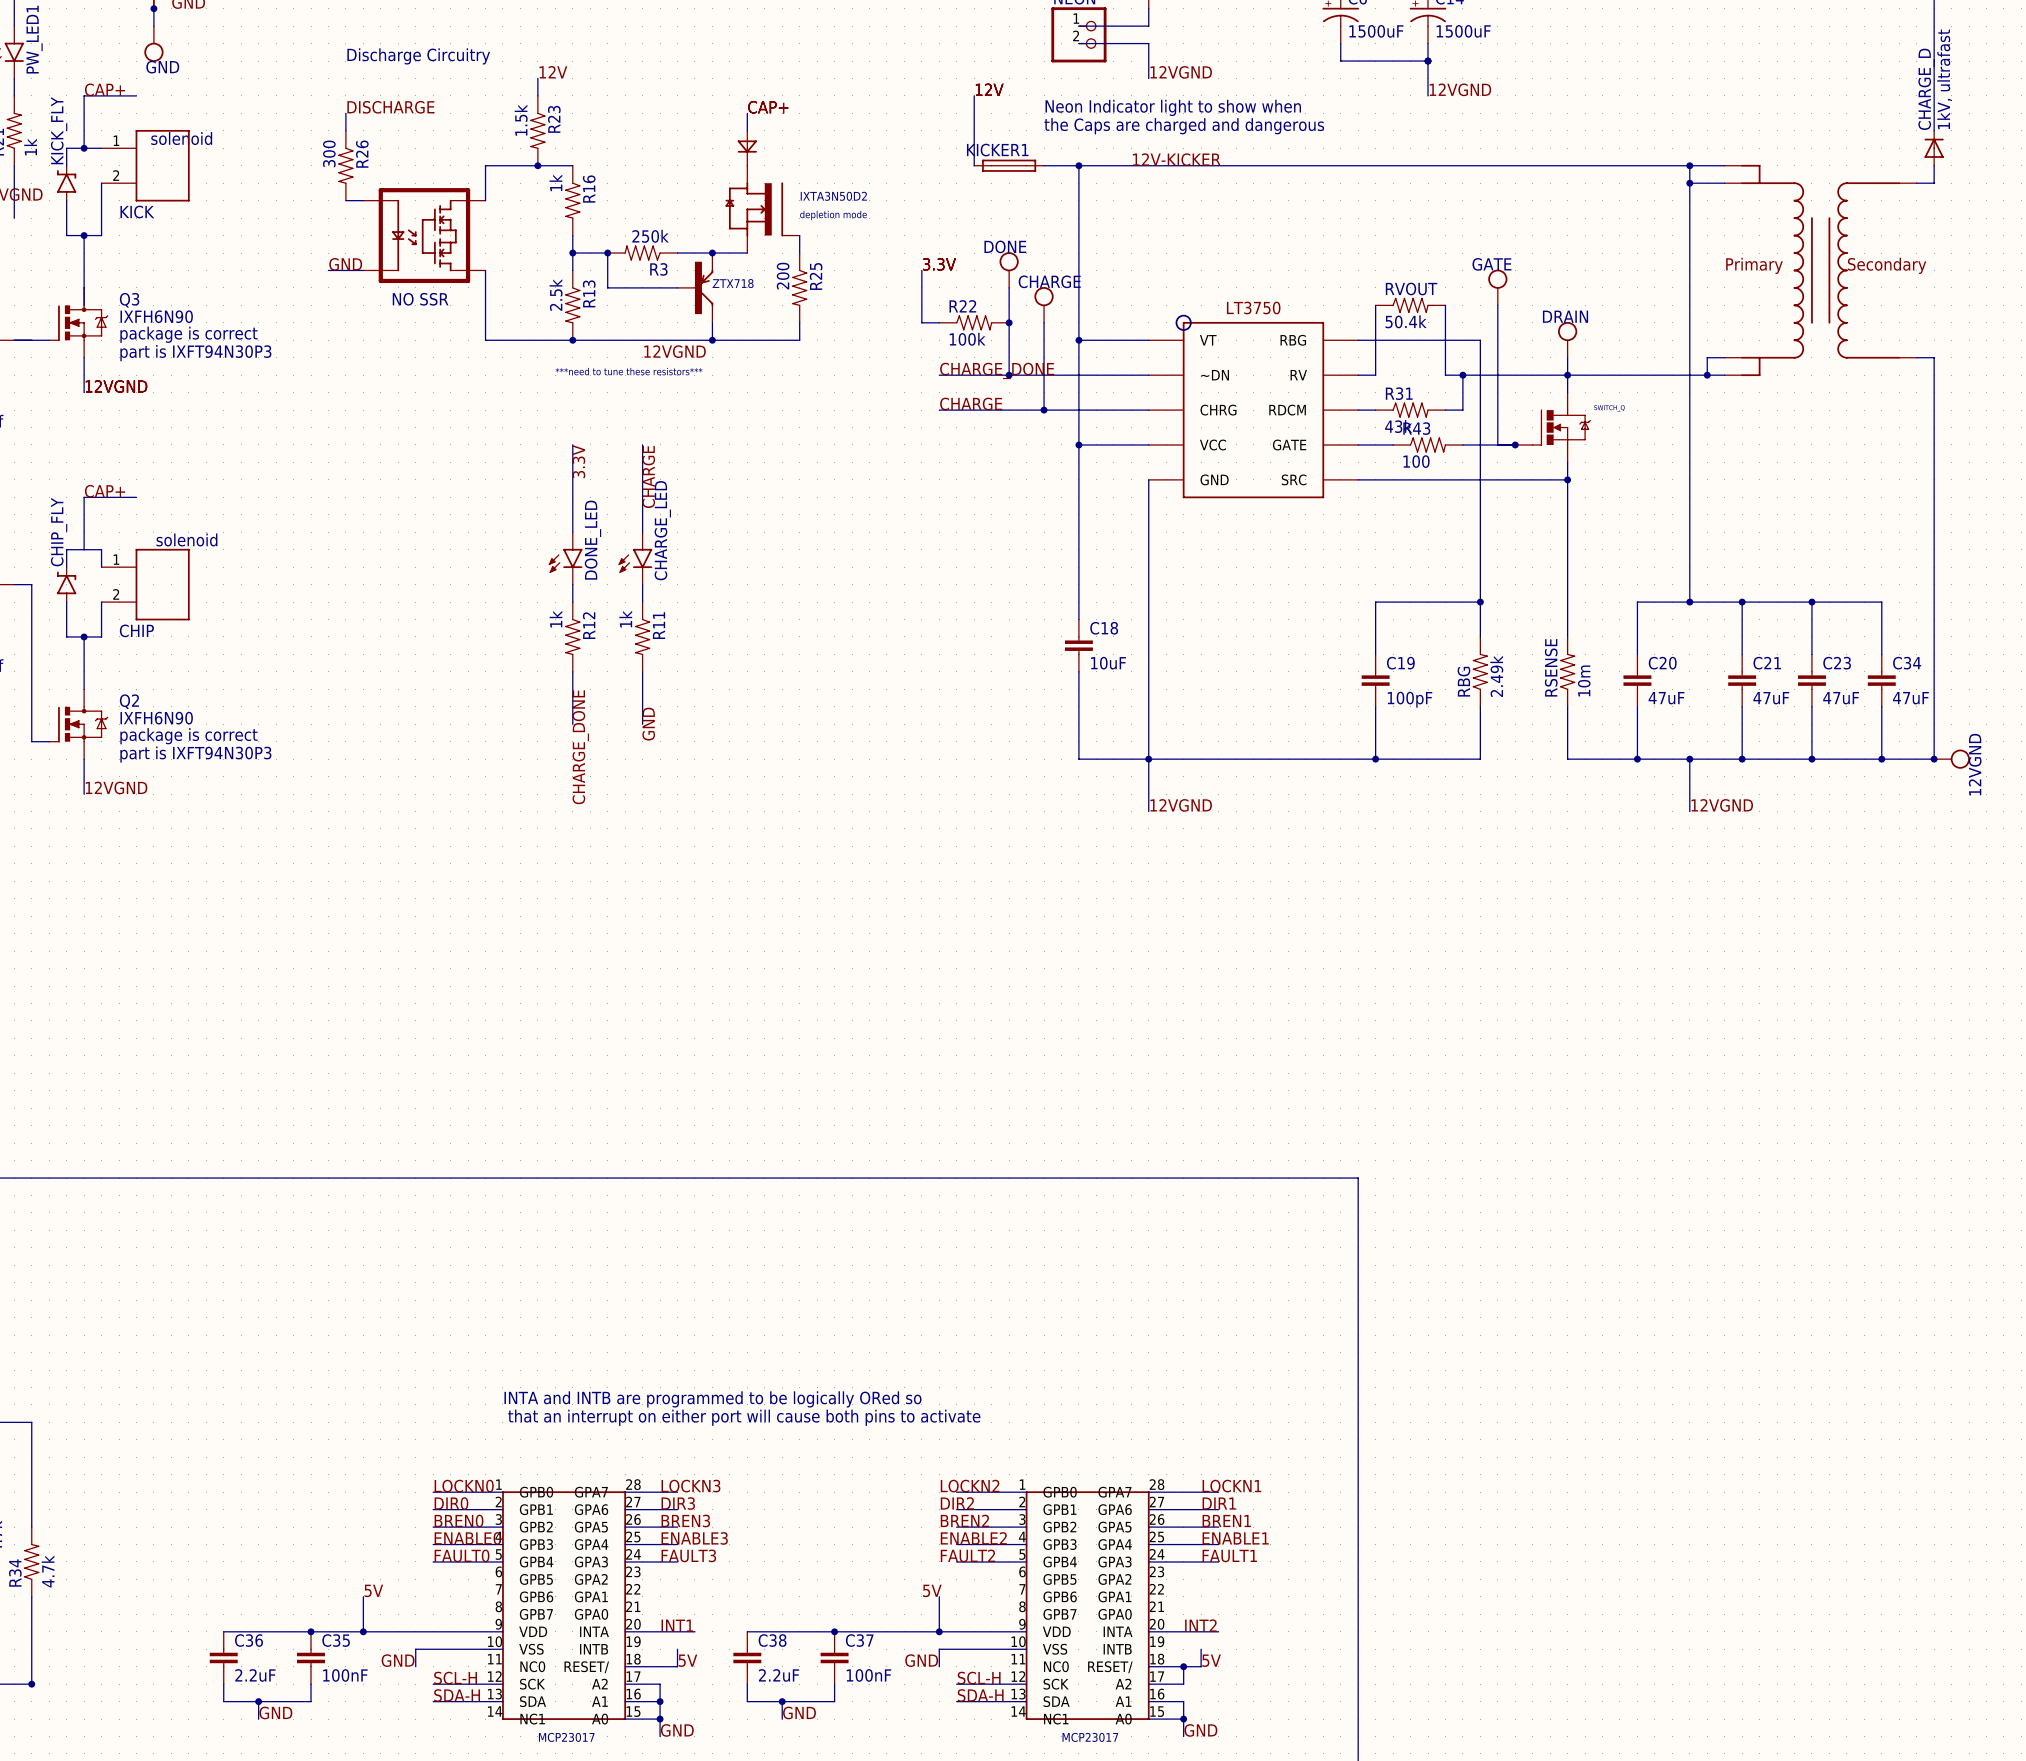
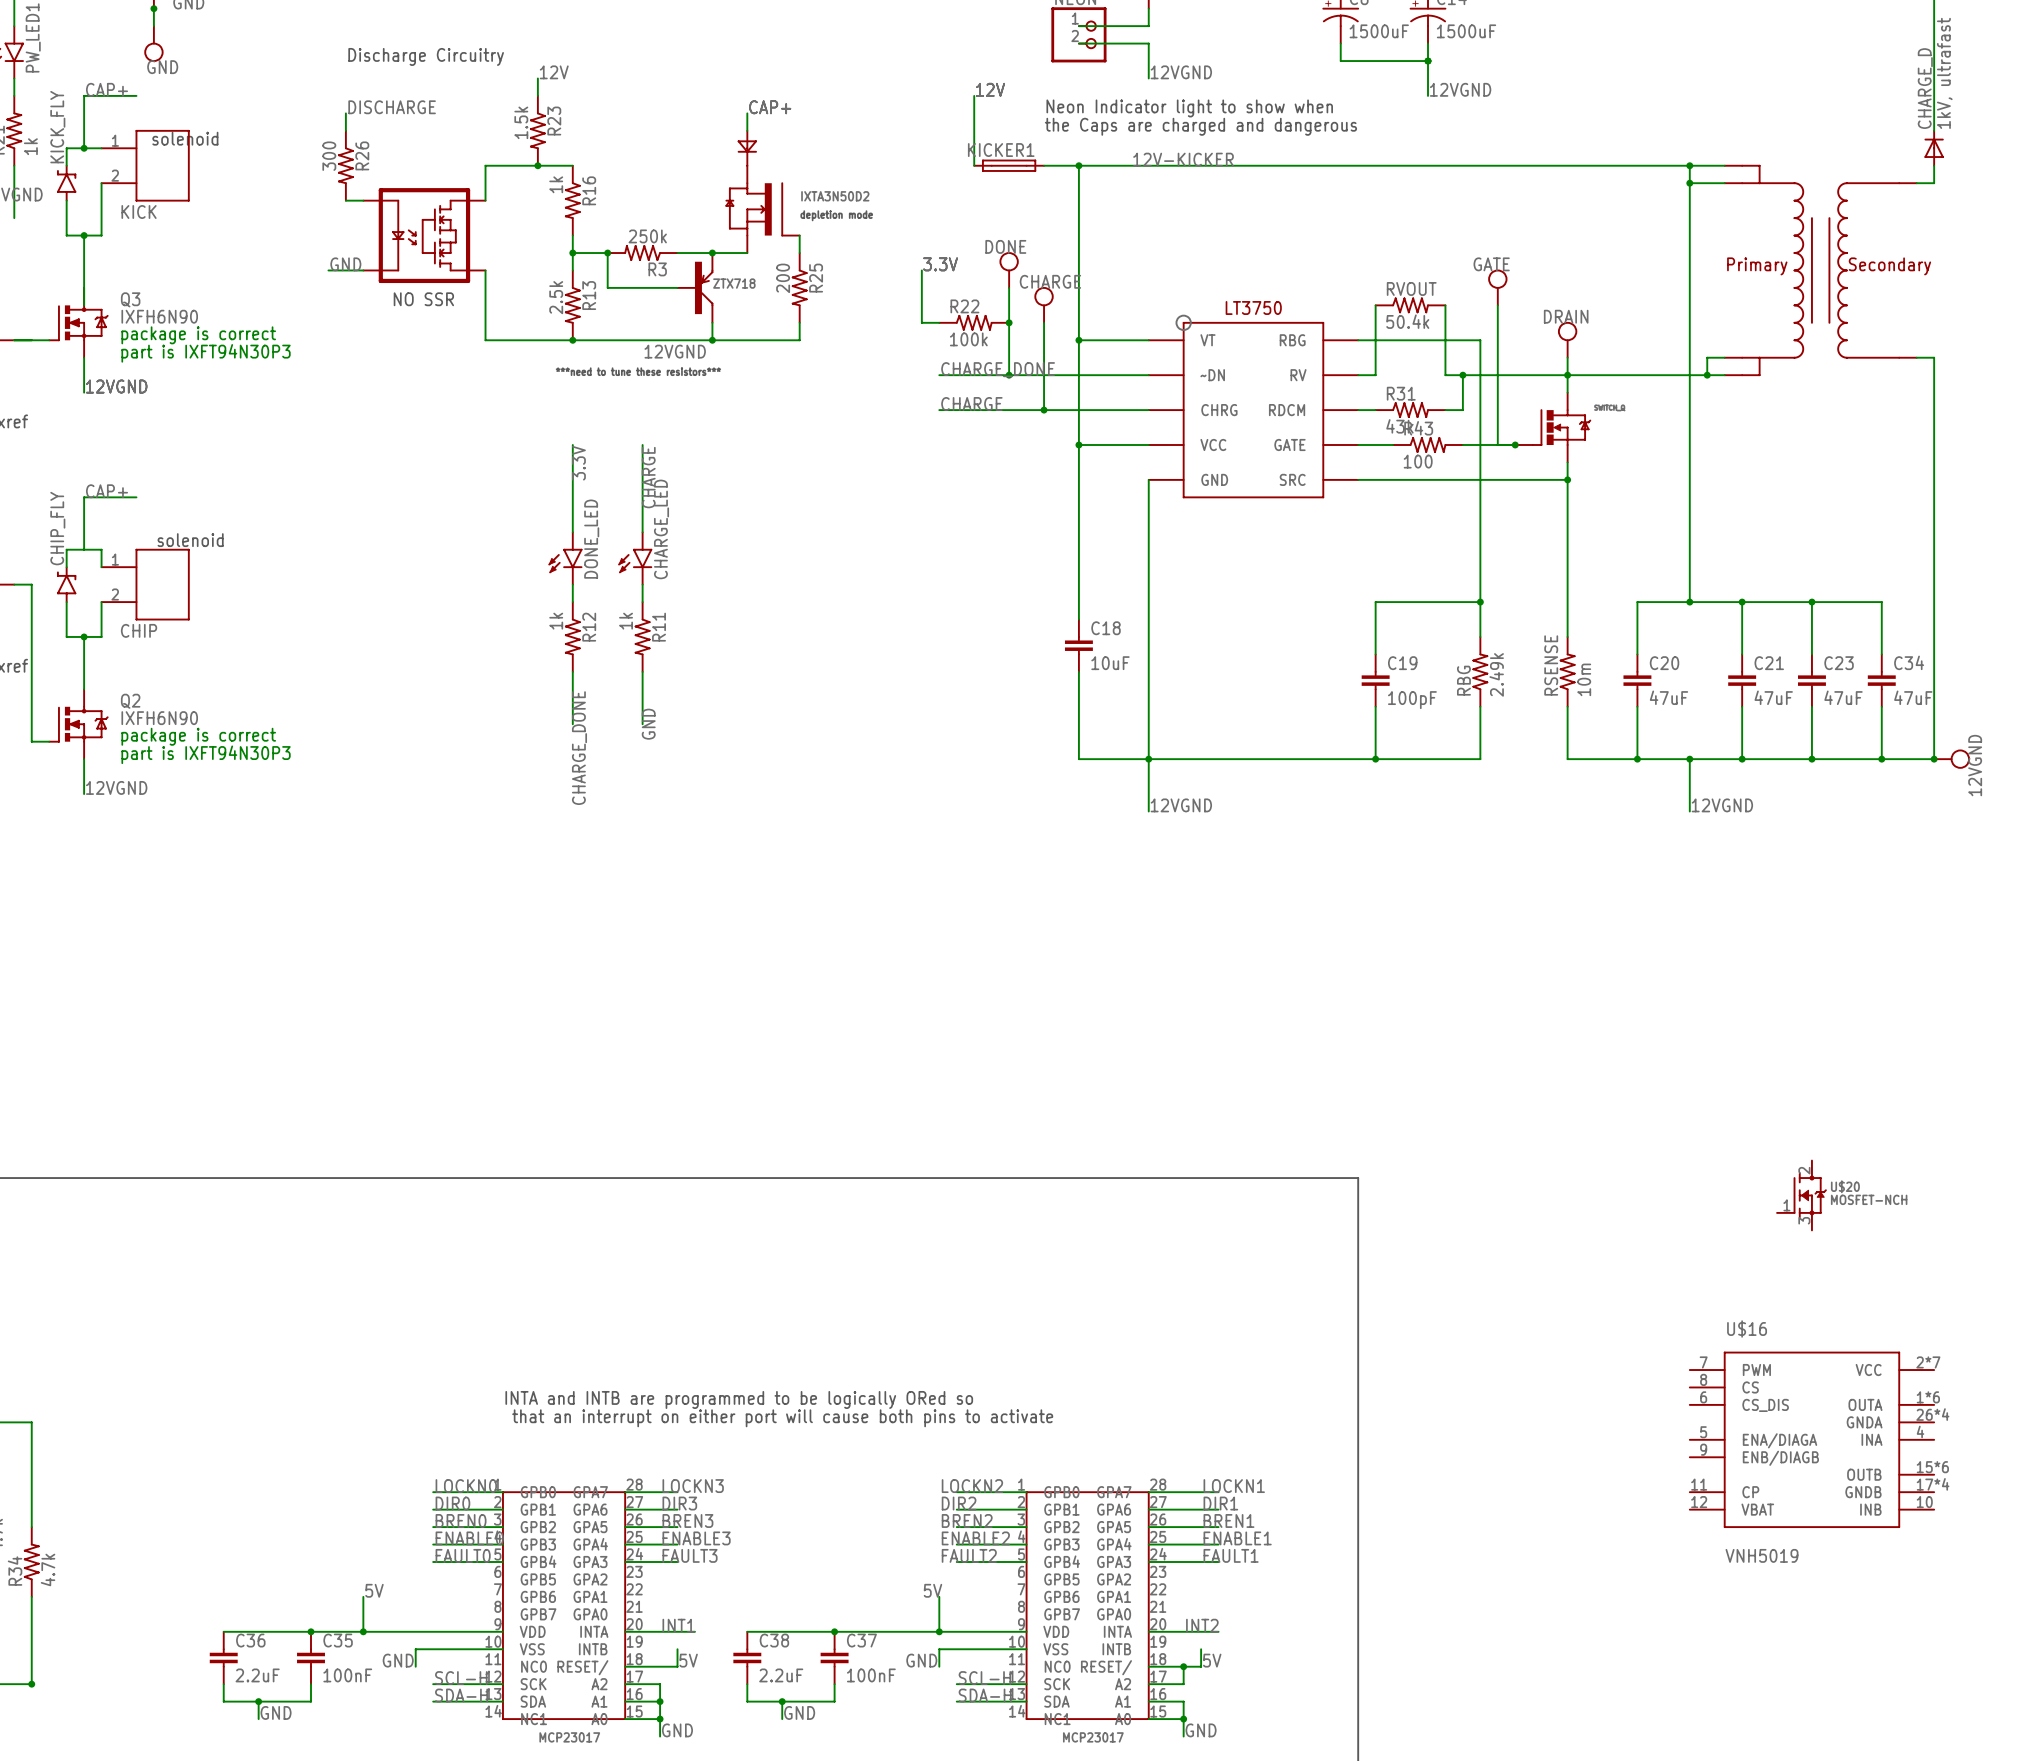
U$20: none -> MOSFET-NCH (1801, 1195)
U$16: none -> VNH5019 (1811, 1439)

